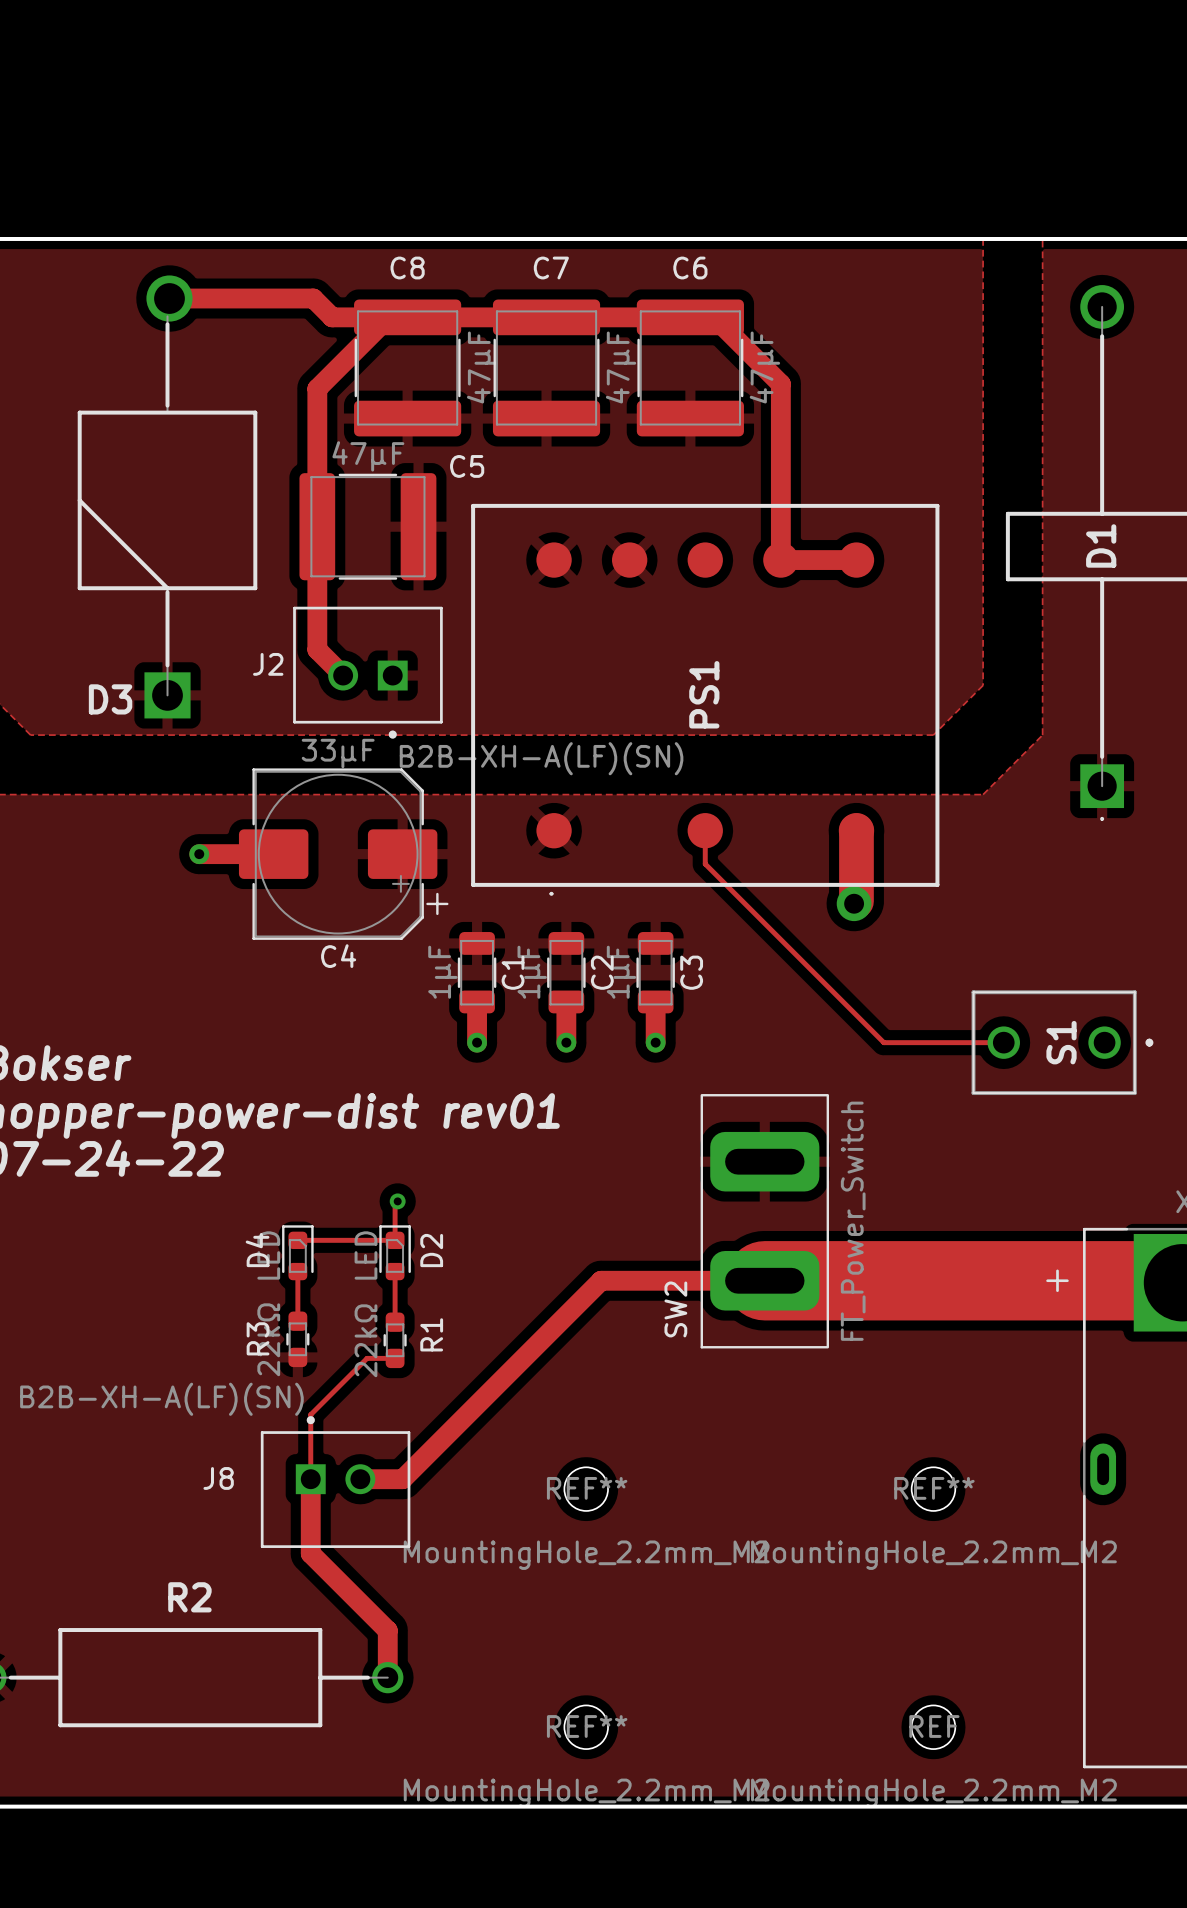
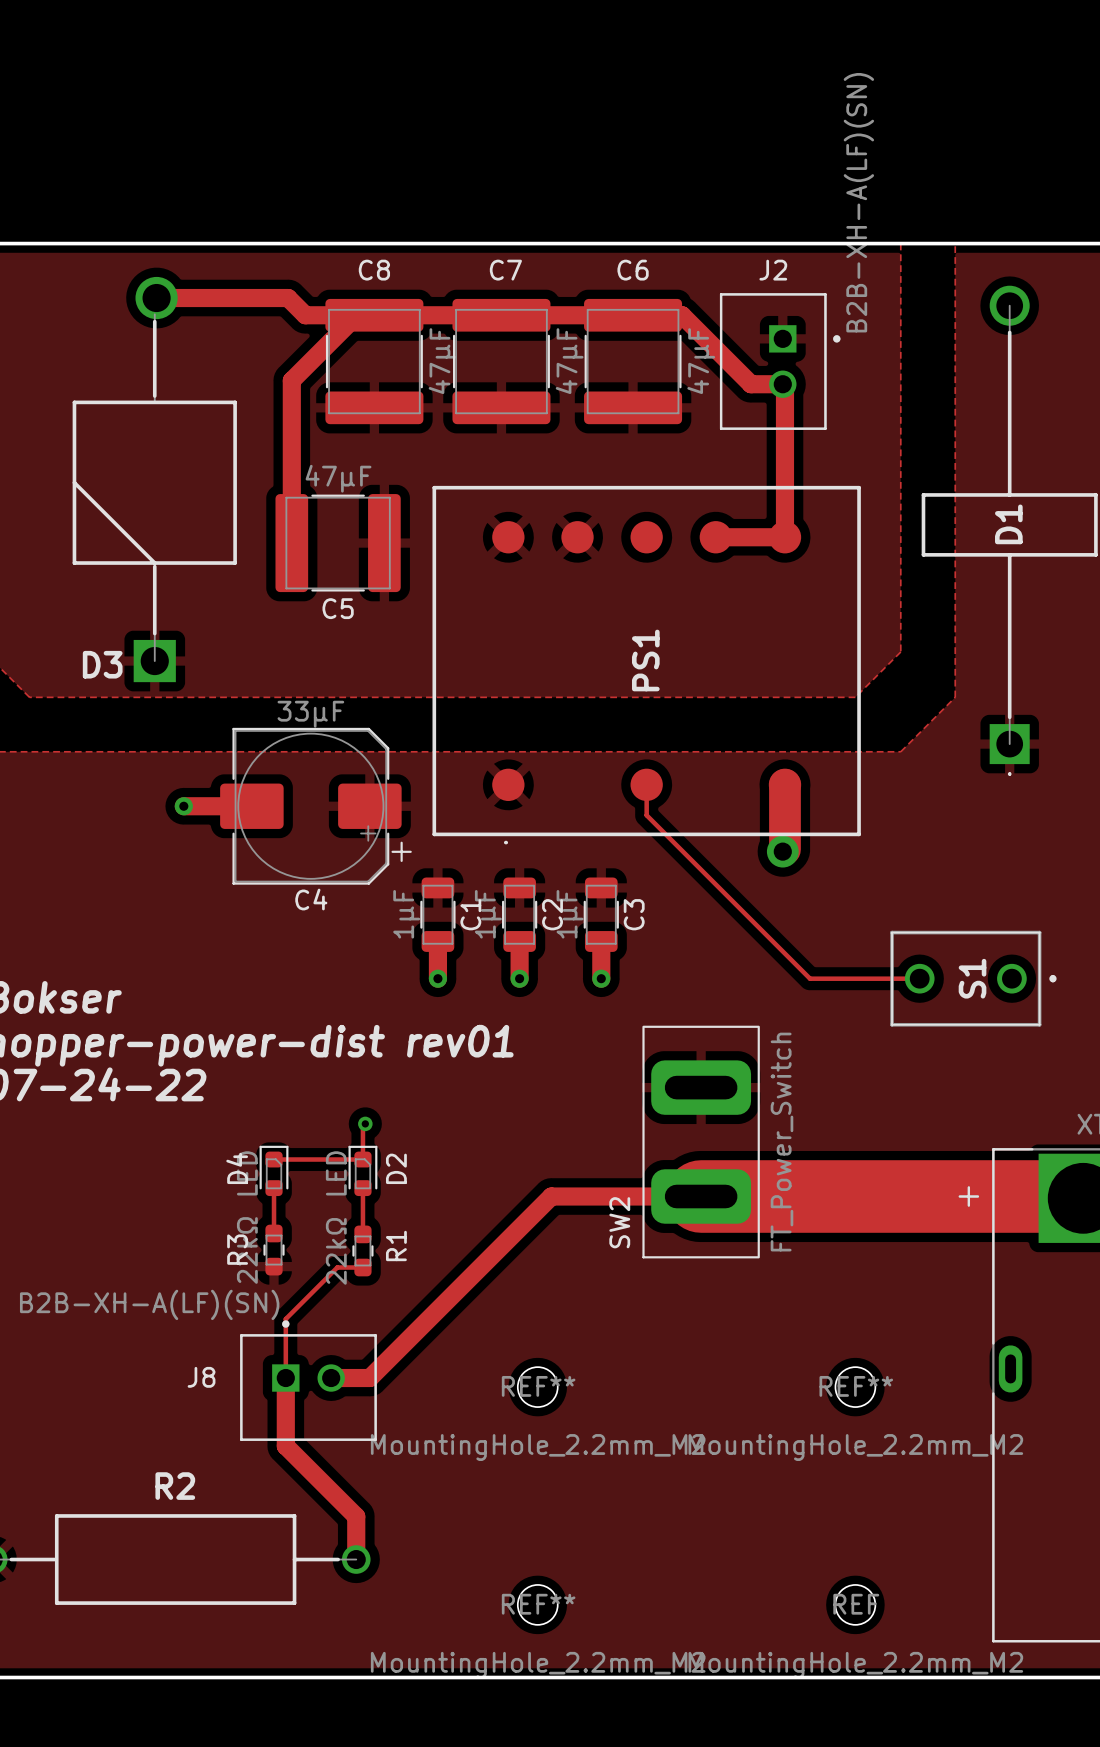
track: (714, 317) (780, 384) (780, 560) -> (654, 315) (682, 315) (751, 384) (782, 384) (784, 386) (784, 537)
C5 name position: C5 (467, 466) -> C5 (338, 608)
C5 position: (367, 526) -> (338, 543)
track: (317, 566) (317, 649) (343, 675) -> none
J2 name position: J2 (268, 664) -> J2 (773, 270)
J2 rotation: 0° (367, 672) -> 90° counterclockwise (780, 361)
J2 position: (367, 672) -> (780, 361)

